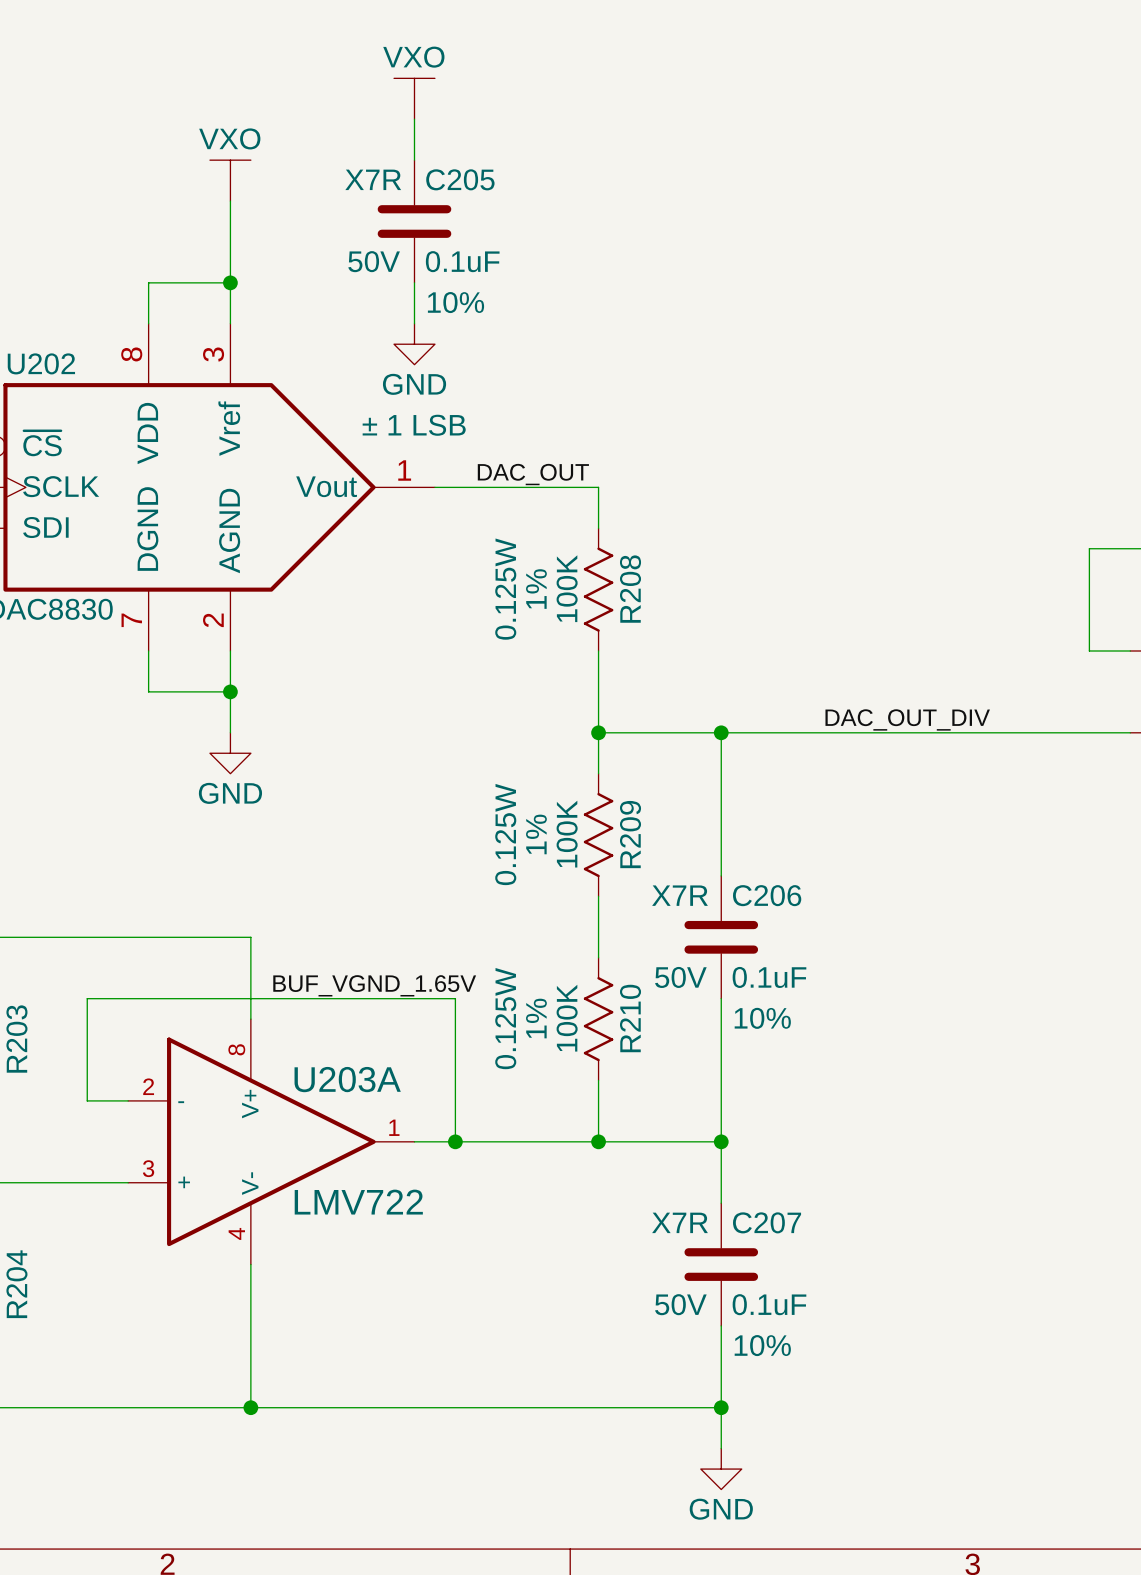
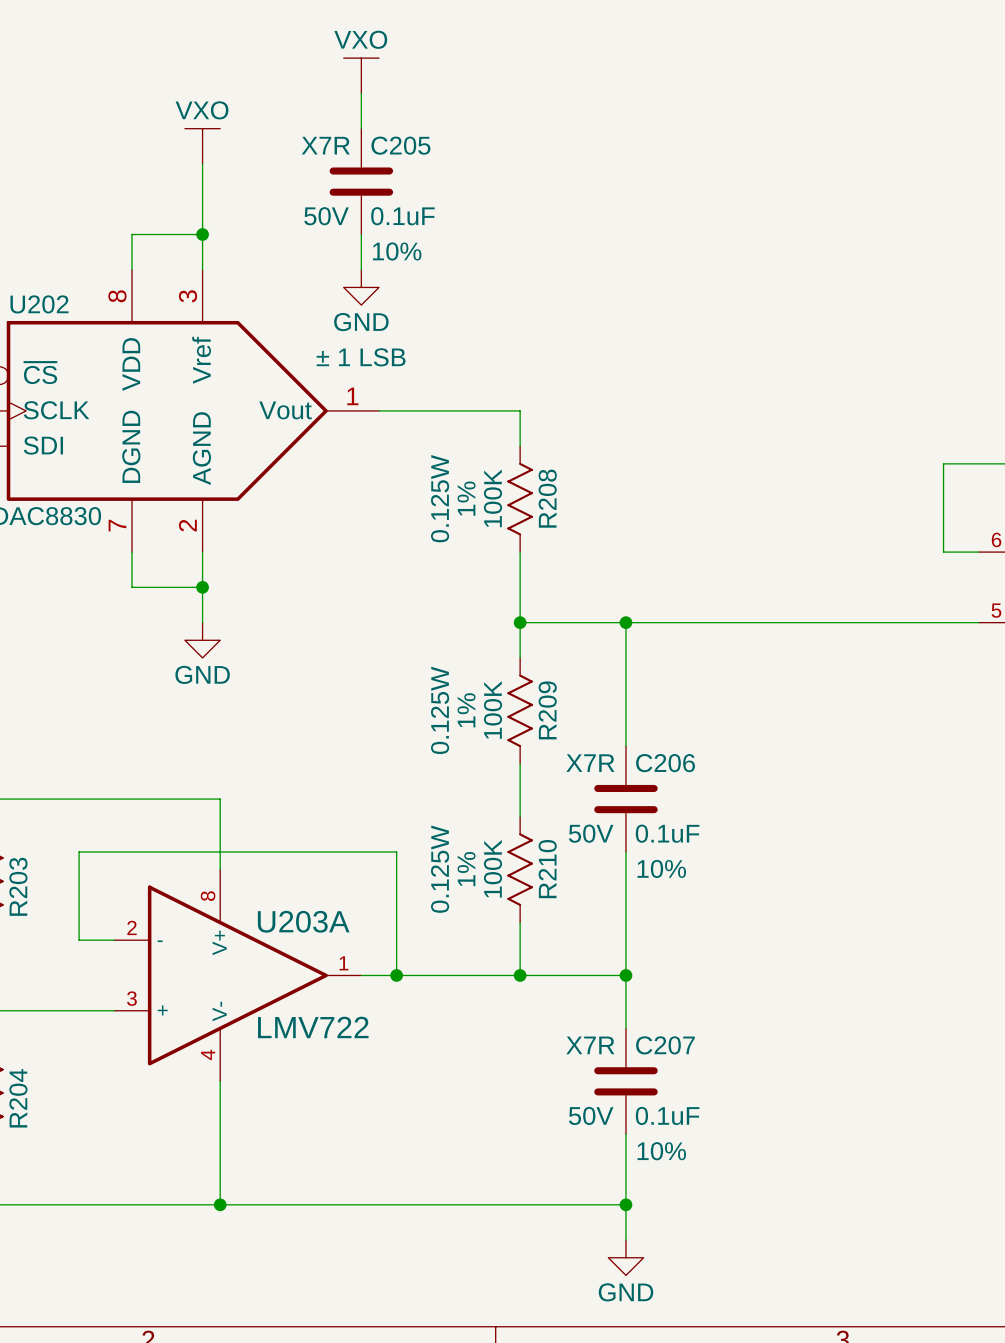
label: DAC_OUT (533, 474) -> none
label: DAC_OUT_DIV (907, 719) -> none
label: BUF_VGND_1.65V (374, 985) -> none

